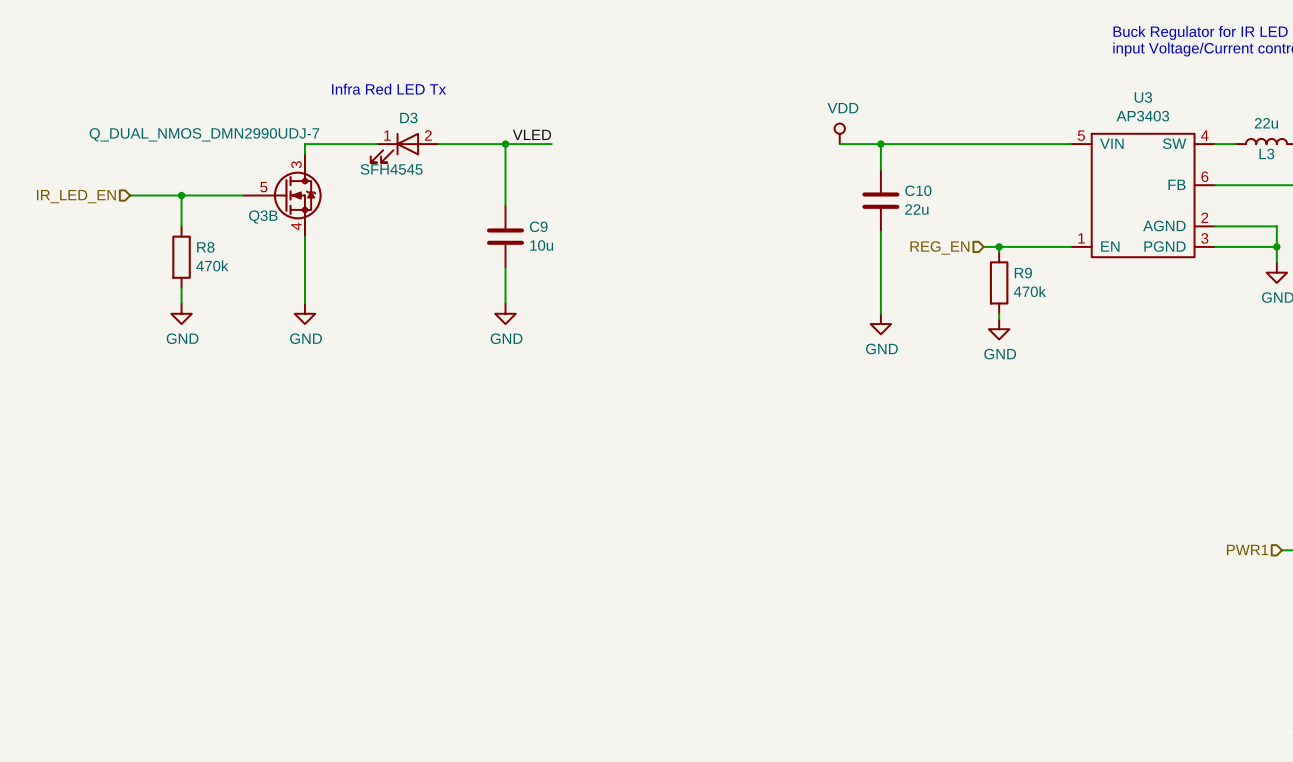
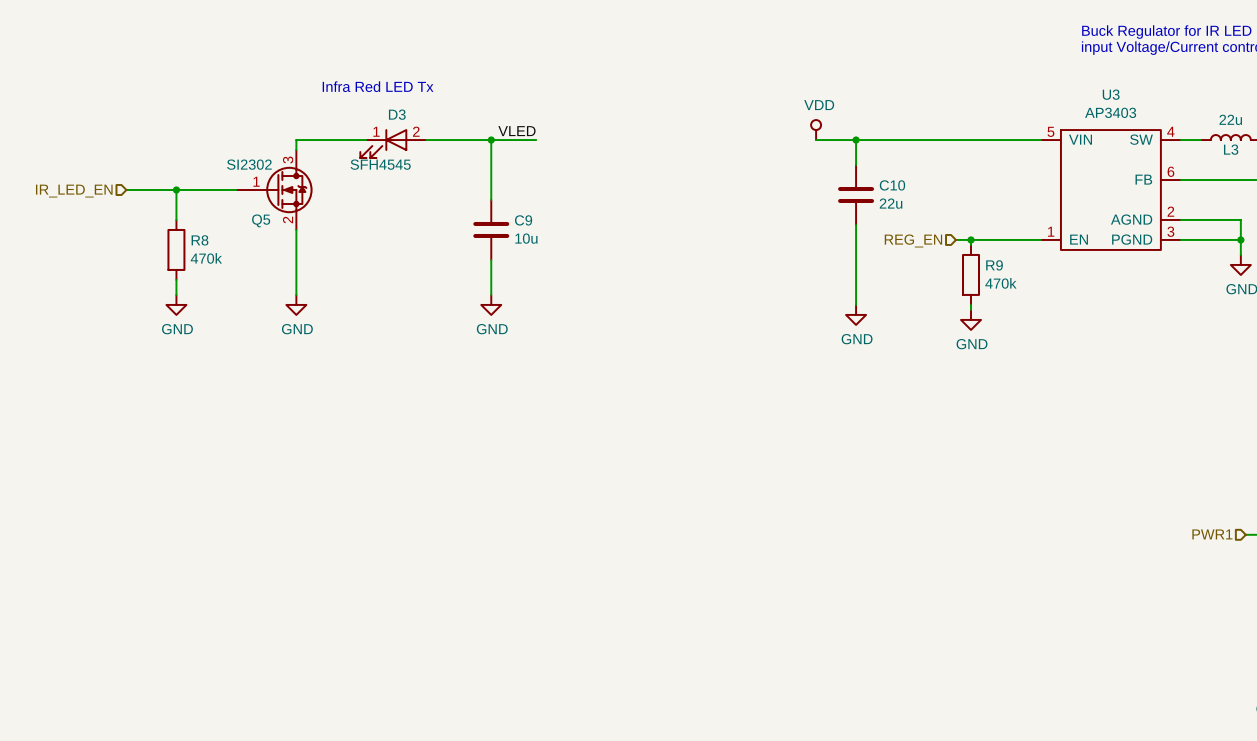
Q3B value: Q_DUAL_NMOS_DMN2990UDJ-7 (204, 134) -> SI2302 (249, 164)
Q3B pin number: 5 (263, 187) -> 1 (256, 181)
Q3B name: Q3B (263, 217) -> Q5 (261, 220)
Q3B pin number: 4 (296, 226) -> 2 (288, 219)

